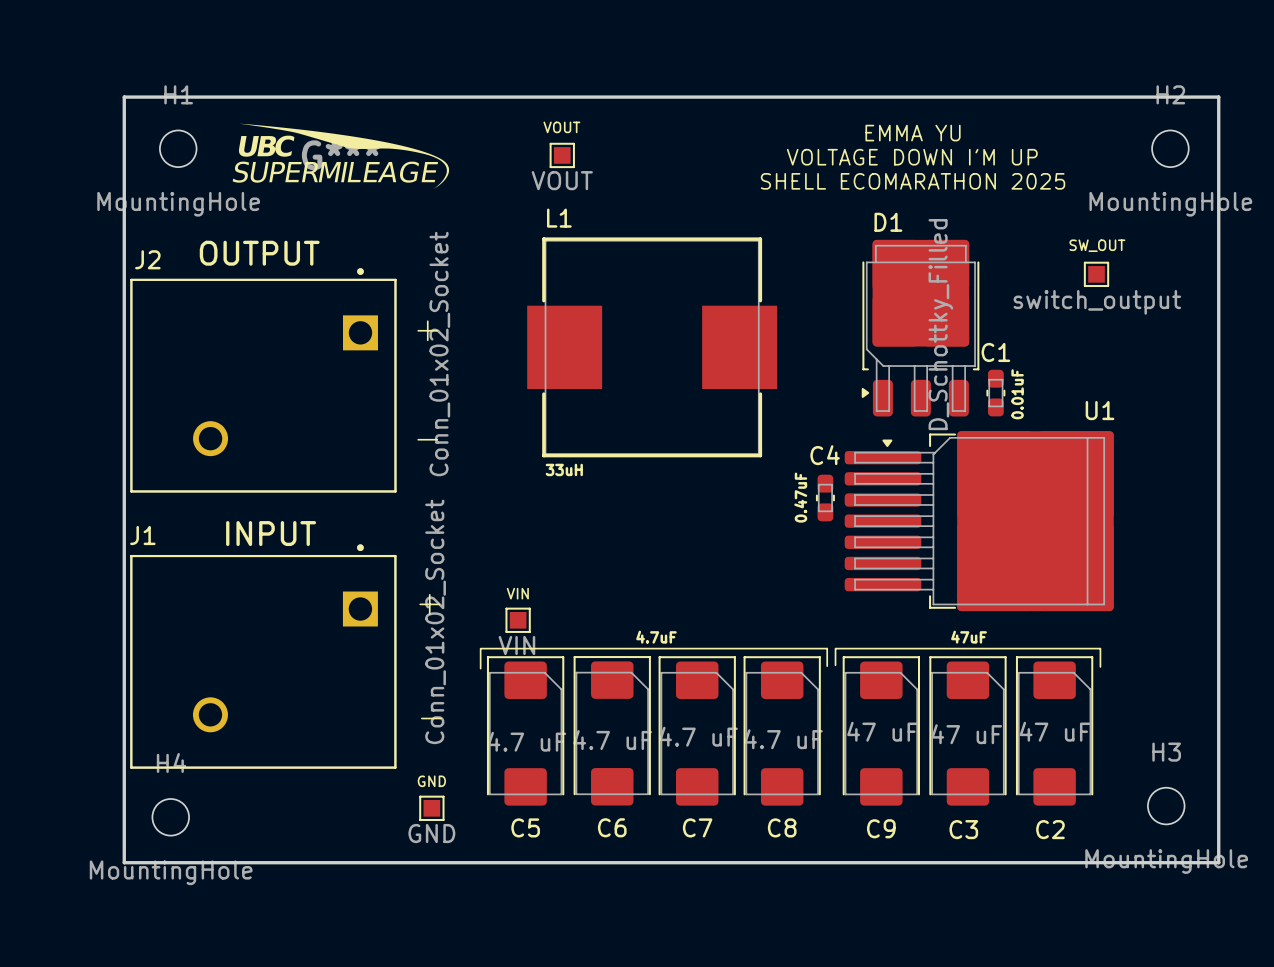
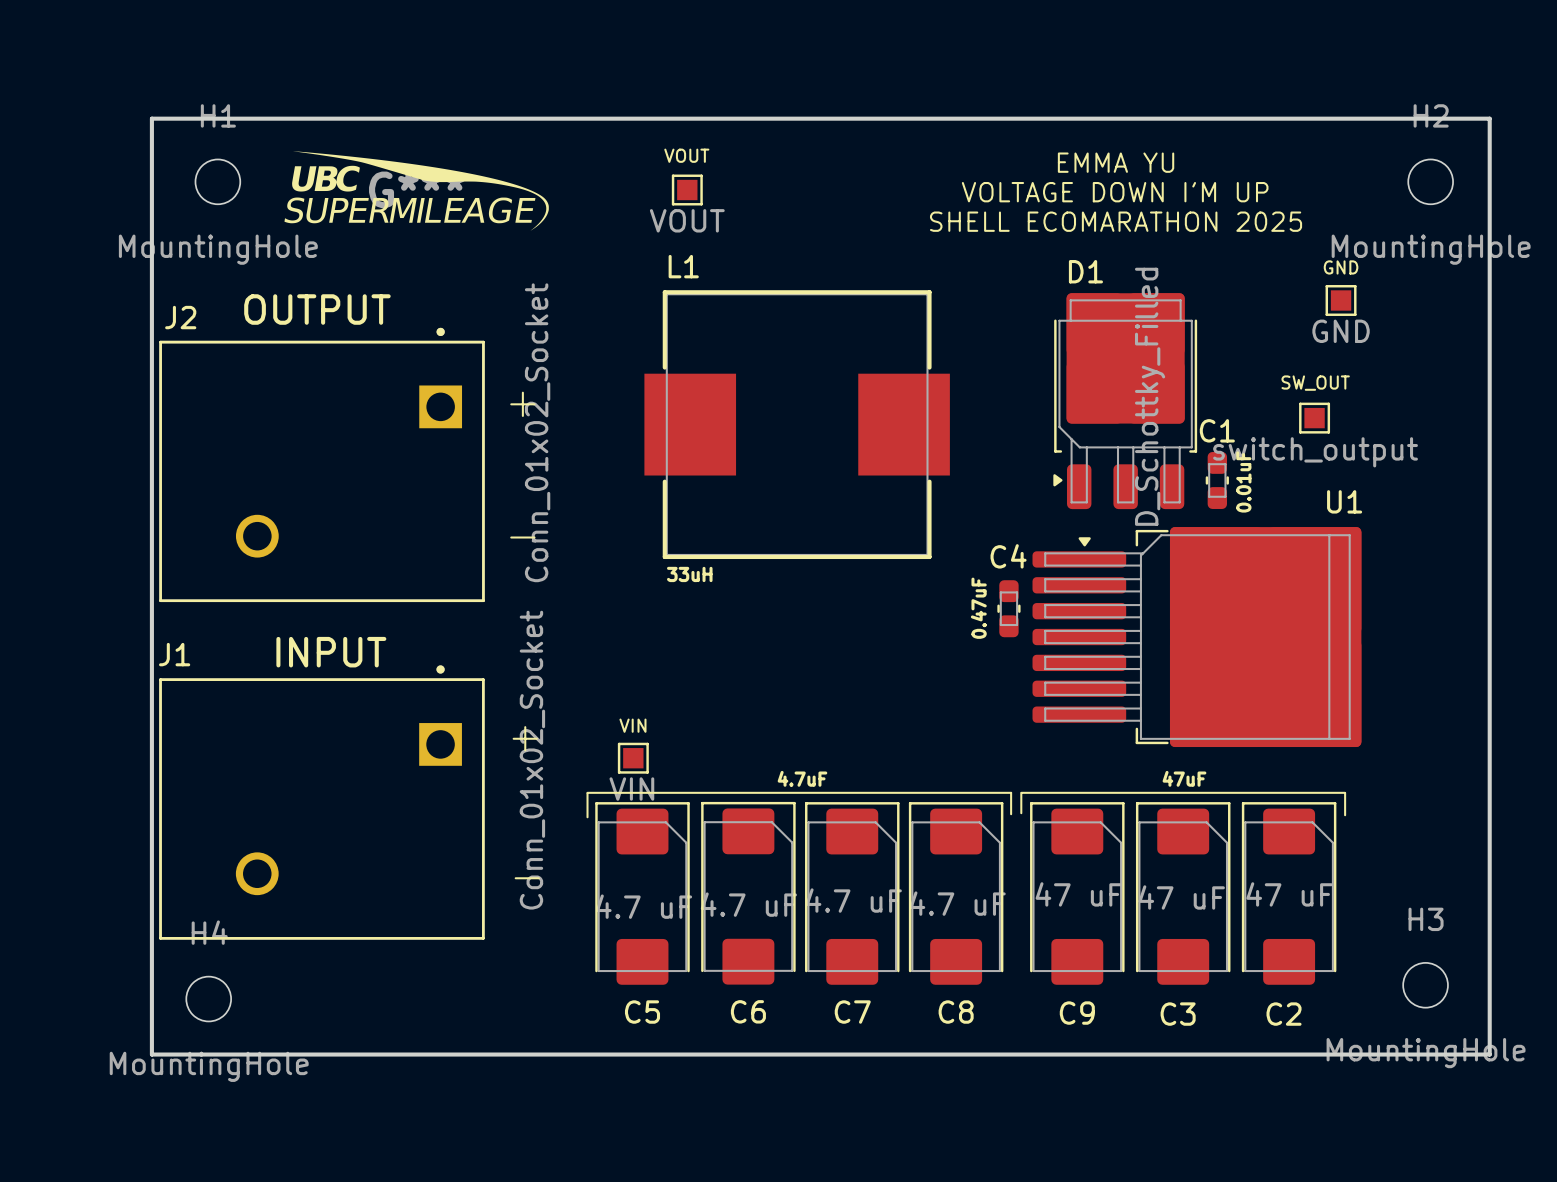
GND: none -> GND (1341, 300)
SW_OUT position: (1096, 274) -> (1314, 418)
GND: GND (431, 808) -> none

